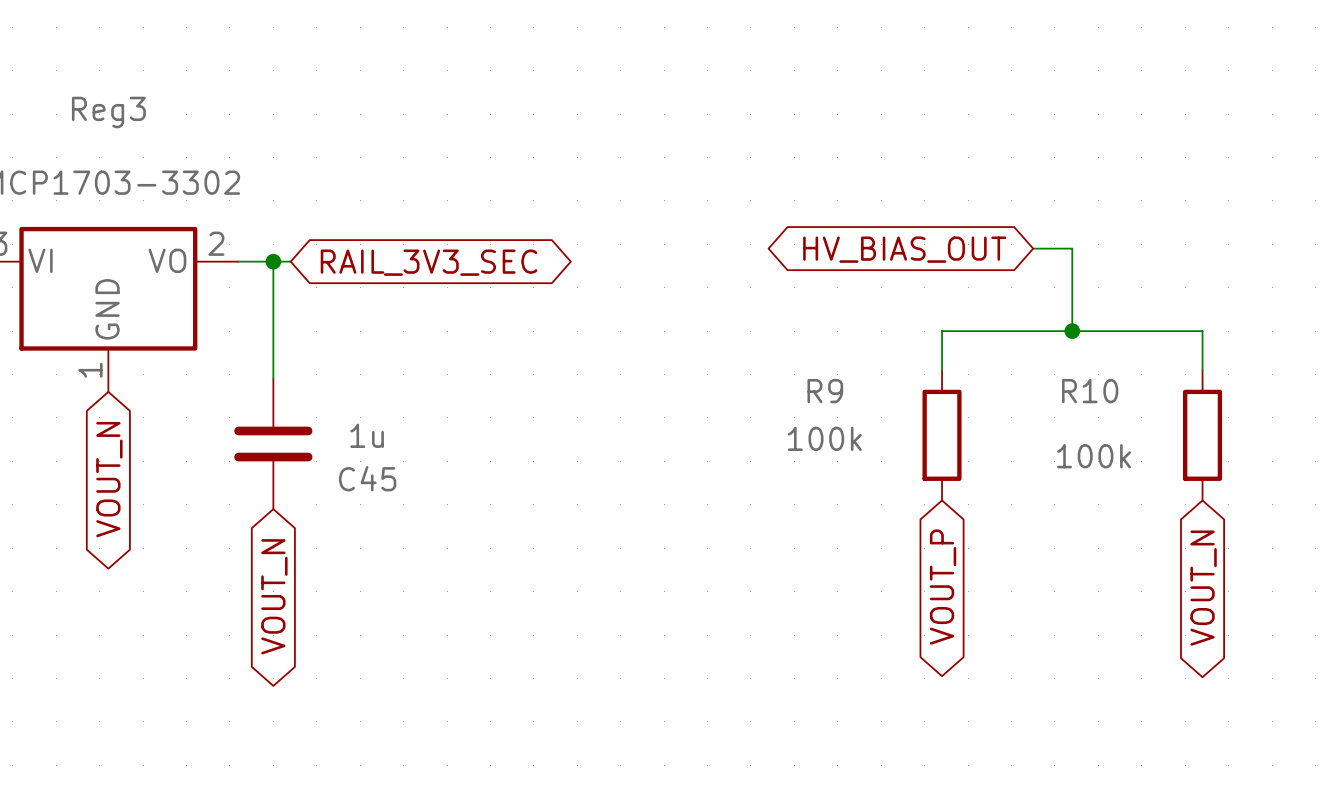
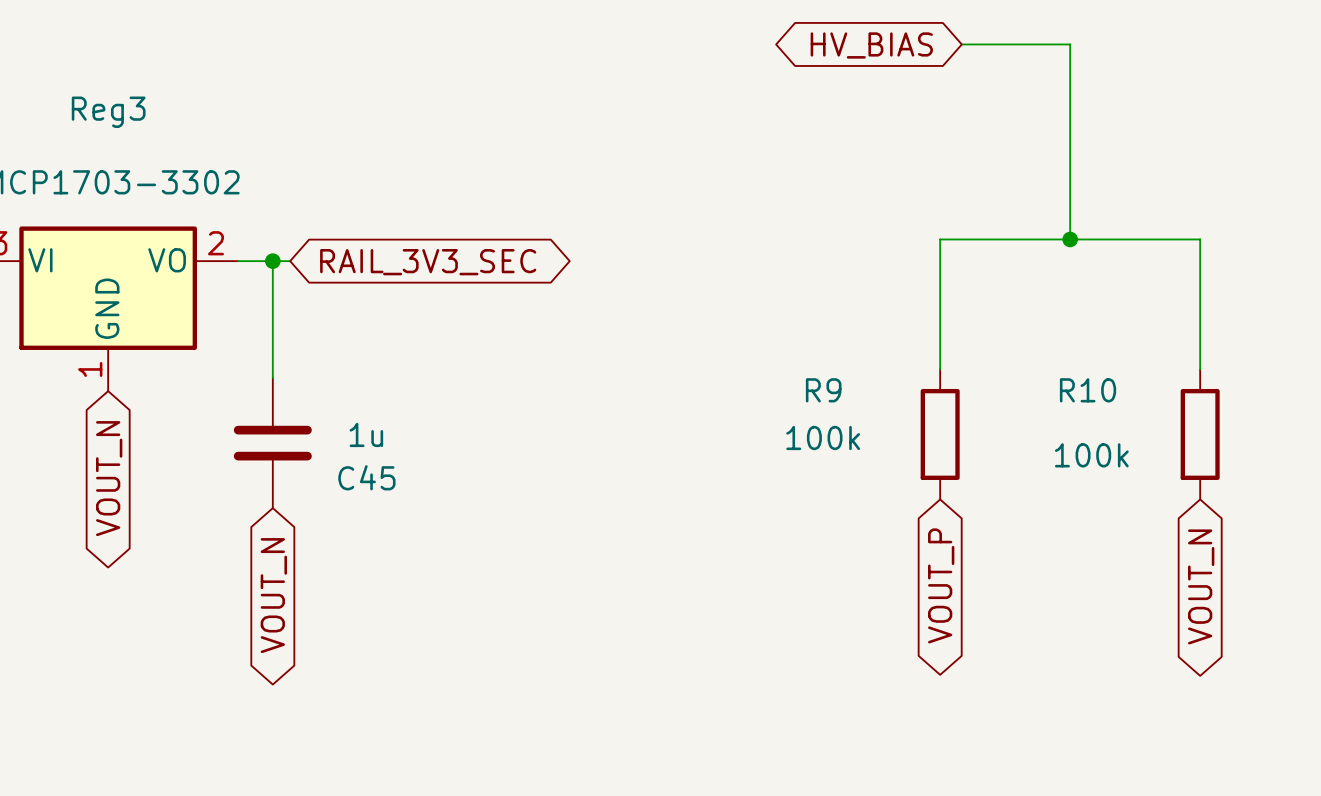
wire: none -> (961, 44) (1070, 44) (1070, 239)
global label: none -> HV_BIAS (871, 45)
wire: (1033, 248) (1072, 248) (1072, 331) -> none
global label: HV_BIAS_OUT (904, 249) -> none
wire: (942, 331) (1202, 331) -> (940, 330) (940, 239) (1200, 239) (1200, 330)
junction position: (1072, 331) -> (1070, 239)

